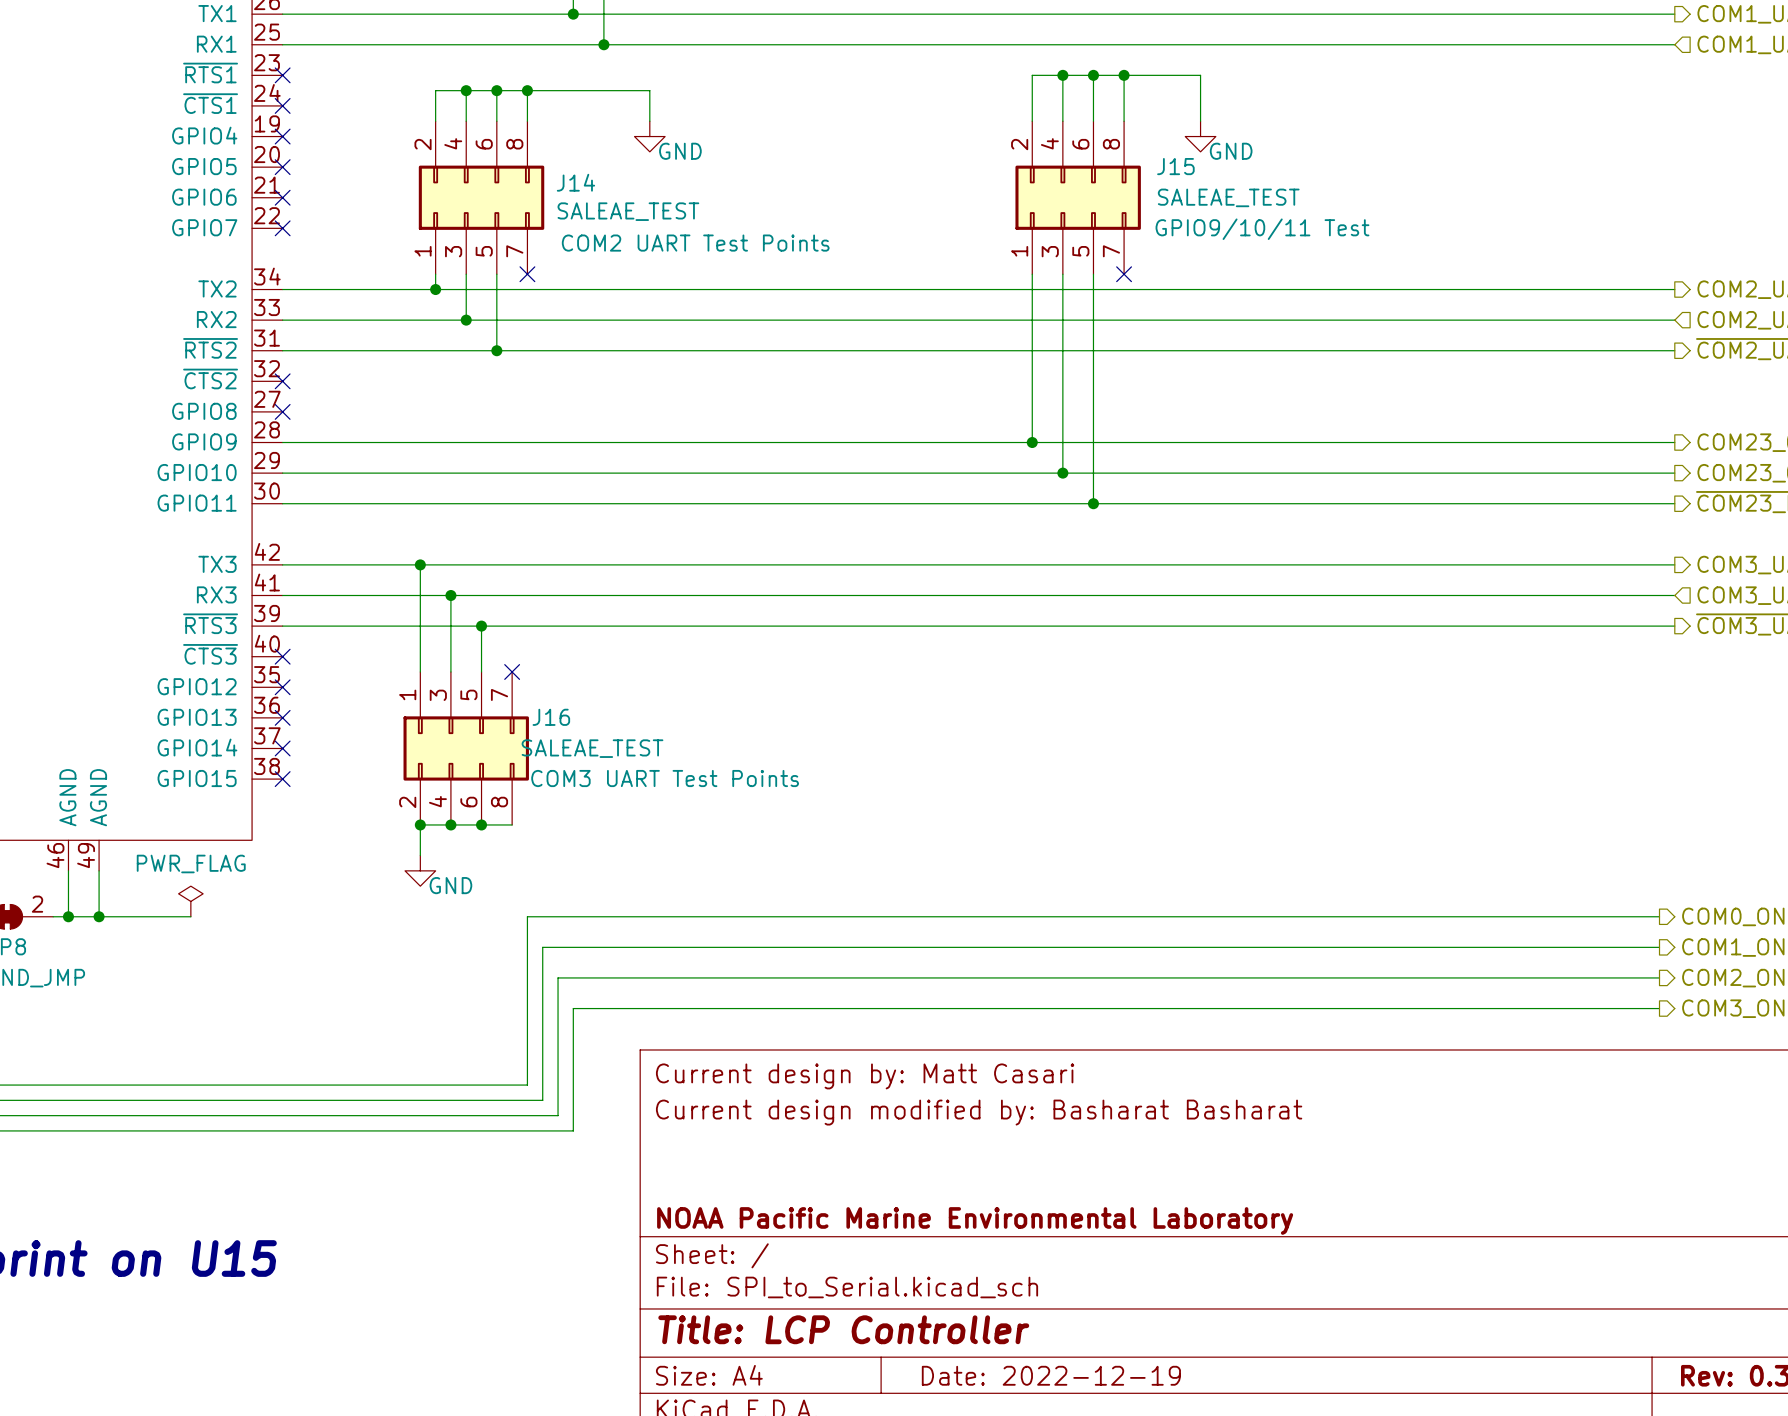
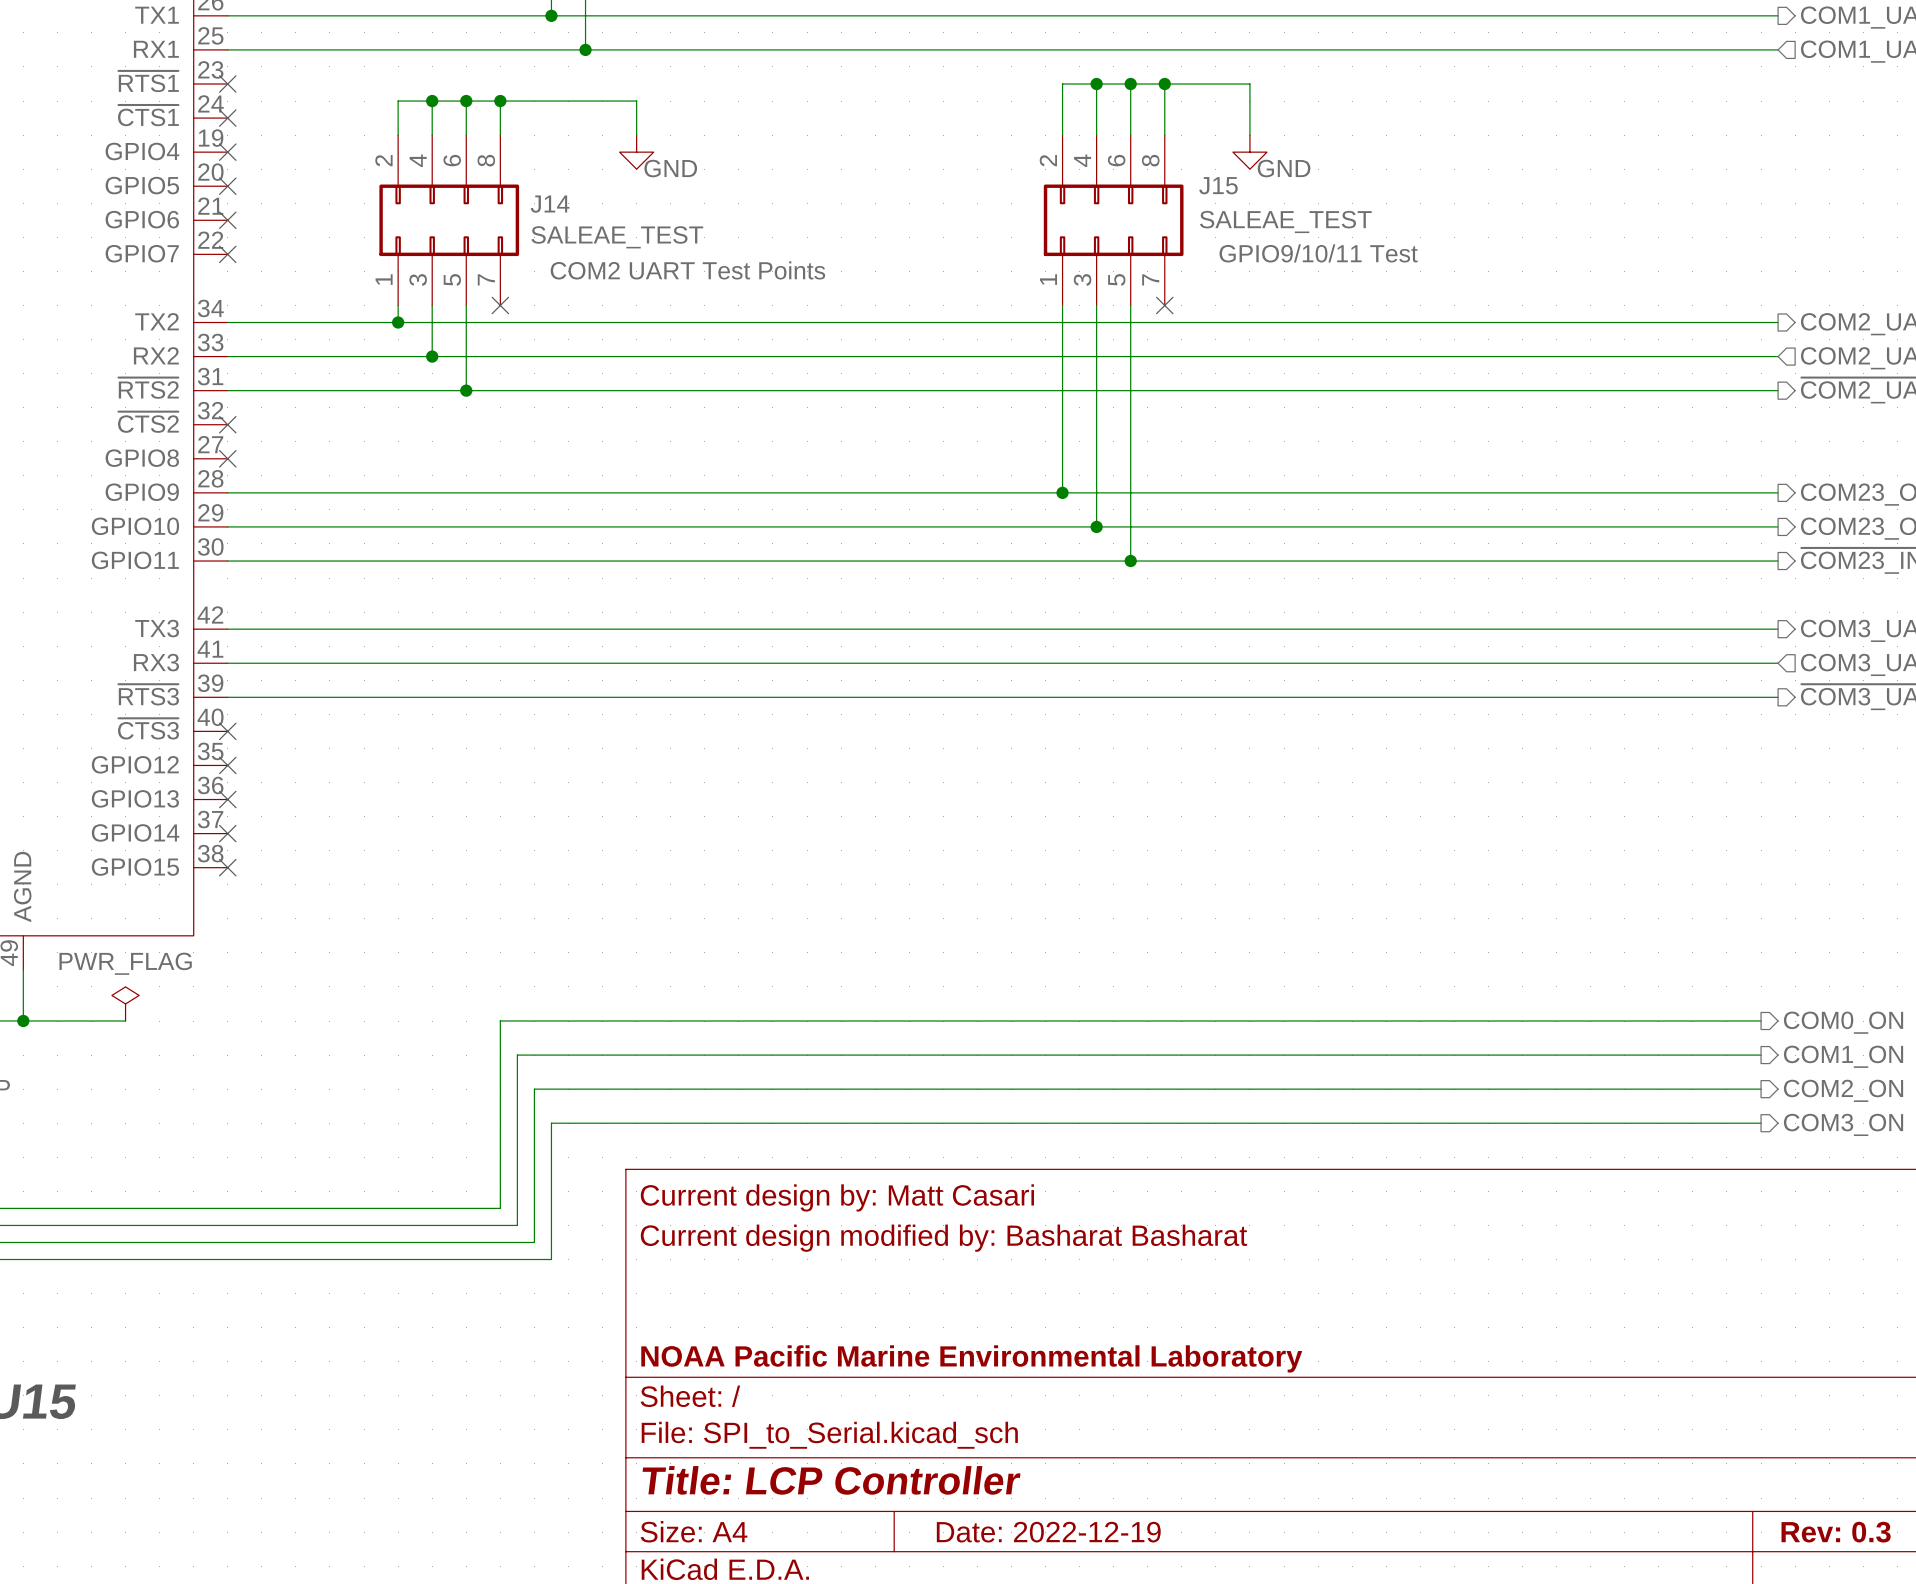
wire: (420, 564) (420, 671) -> none
junction: (420, 564) -> none
wire: (450, 595) (450, 671) -> none
junction: (450, 595) -> none
wire: (481, 626) (481, 671) -> none
junction: (481, 626) -> none
no-connect mark: (512, 671) -> none
J16: SALEAE_TEST (466, 748) -> none
junction: (420, 824) -> none
junction: (450, 824) -> none
junction: (481, 824) -> none
wire: (512, 824) (420, 824) (420, 855) -> none
power symbol: GND (420, 870) -> none

